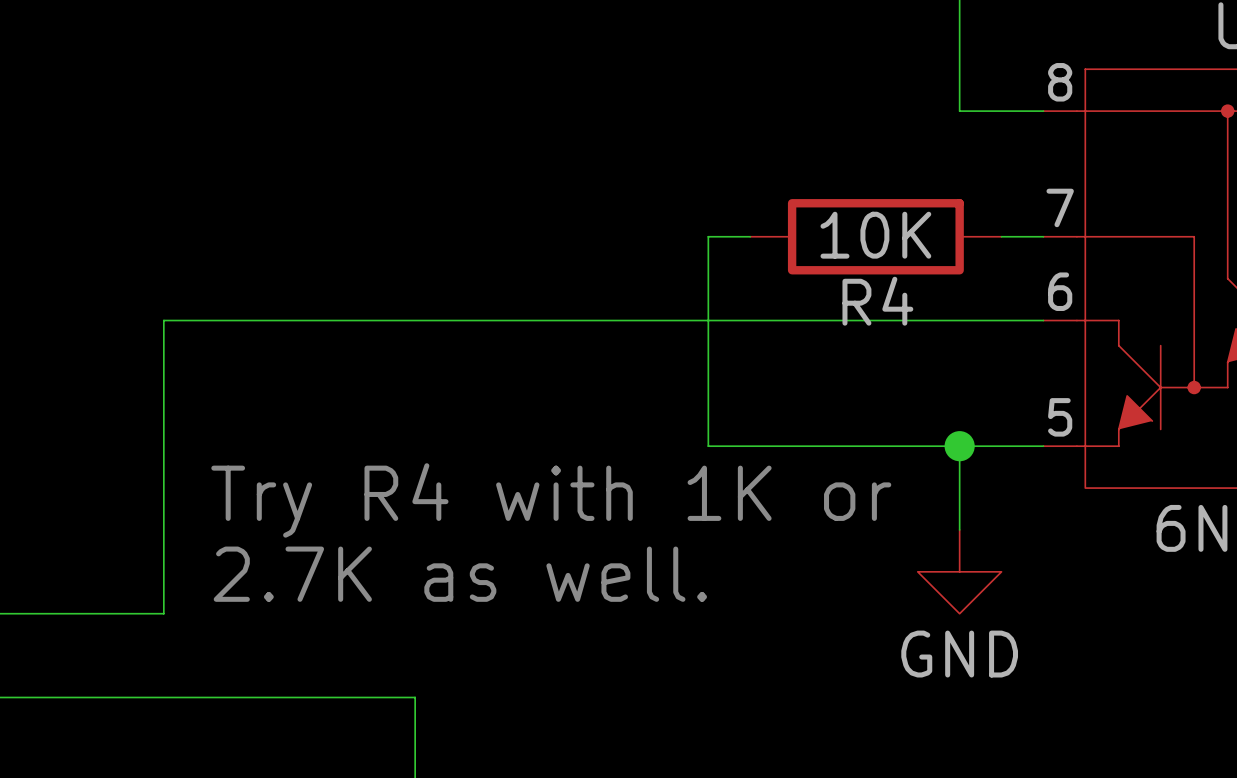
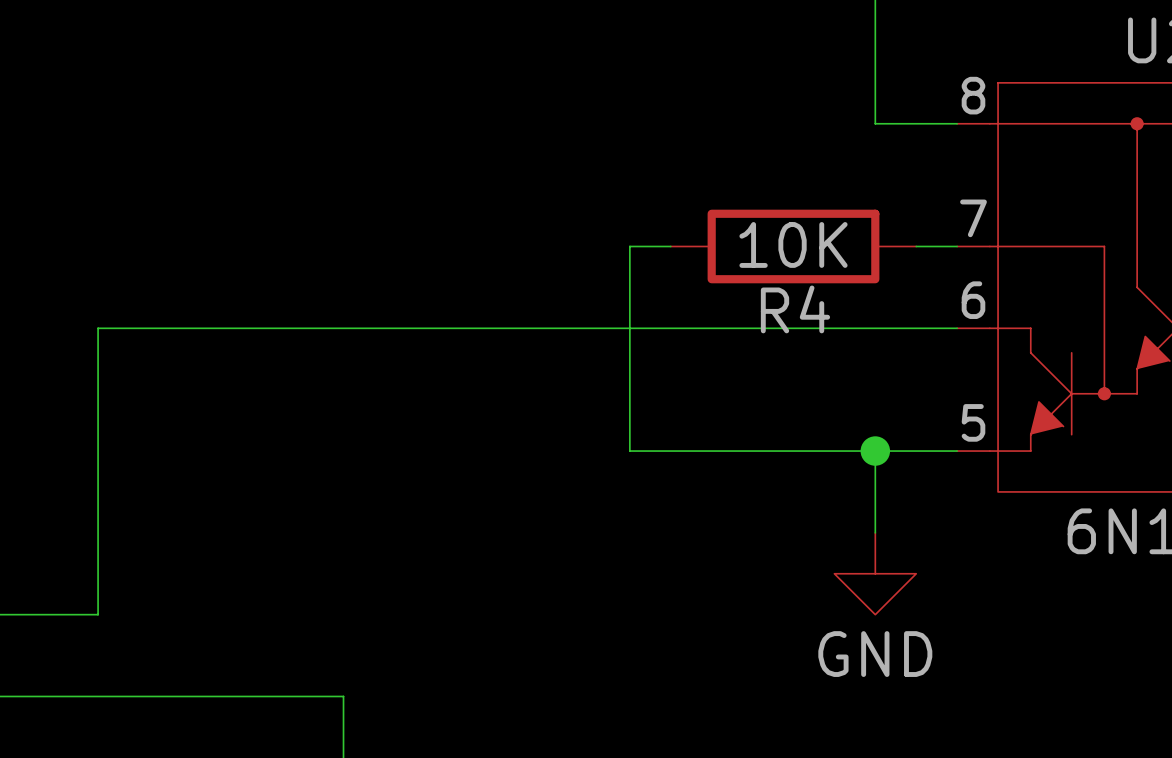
text: Try R4 with 1K or (551, 500) -> none
text: 2.7K as well. (460, 574) -> none

